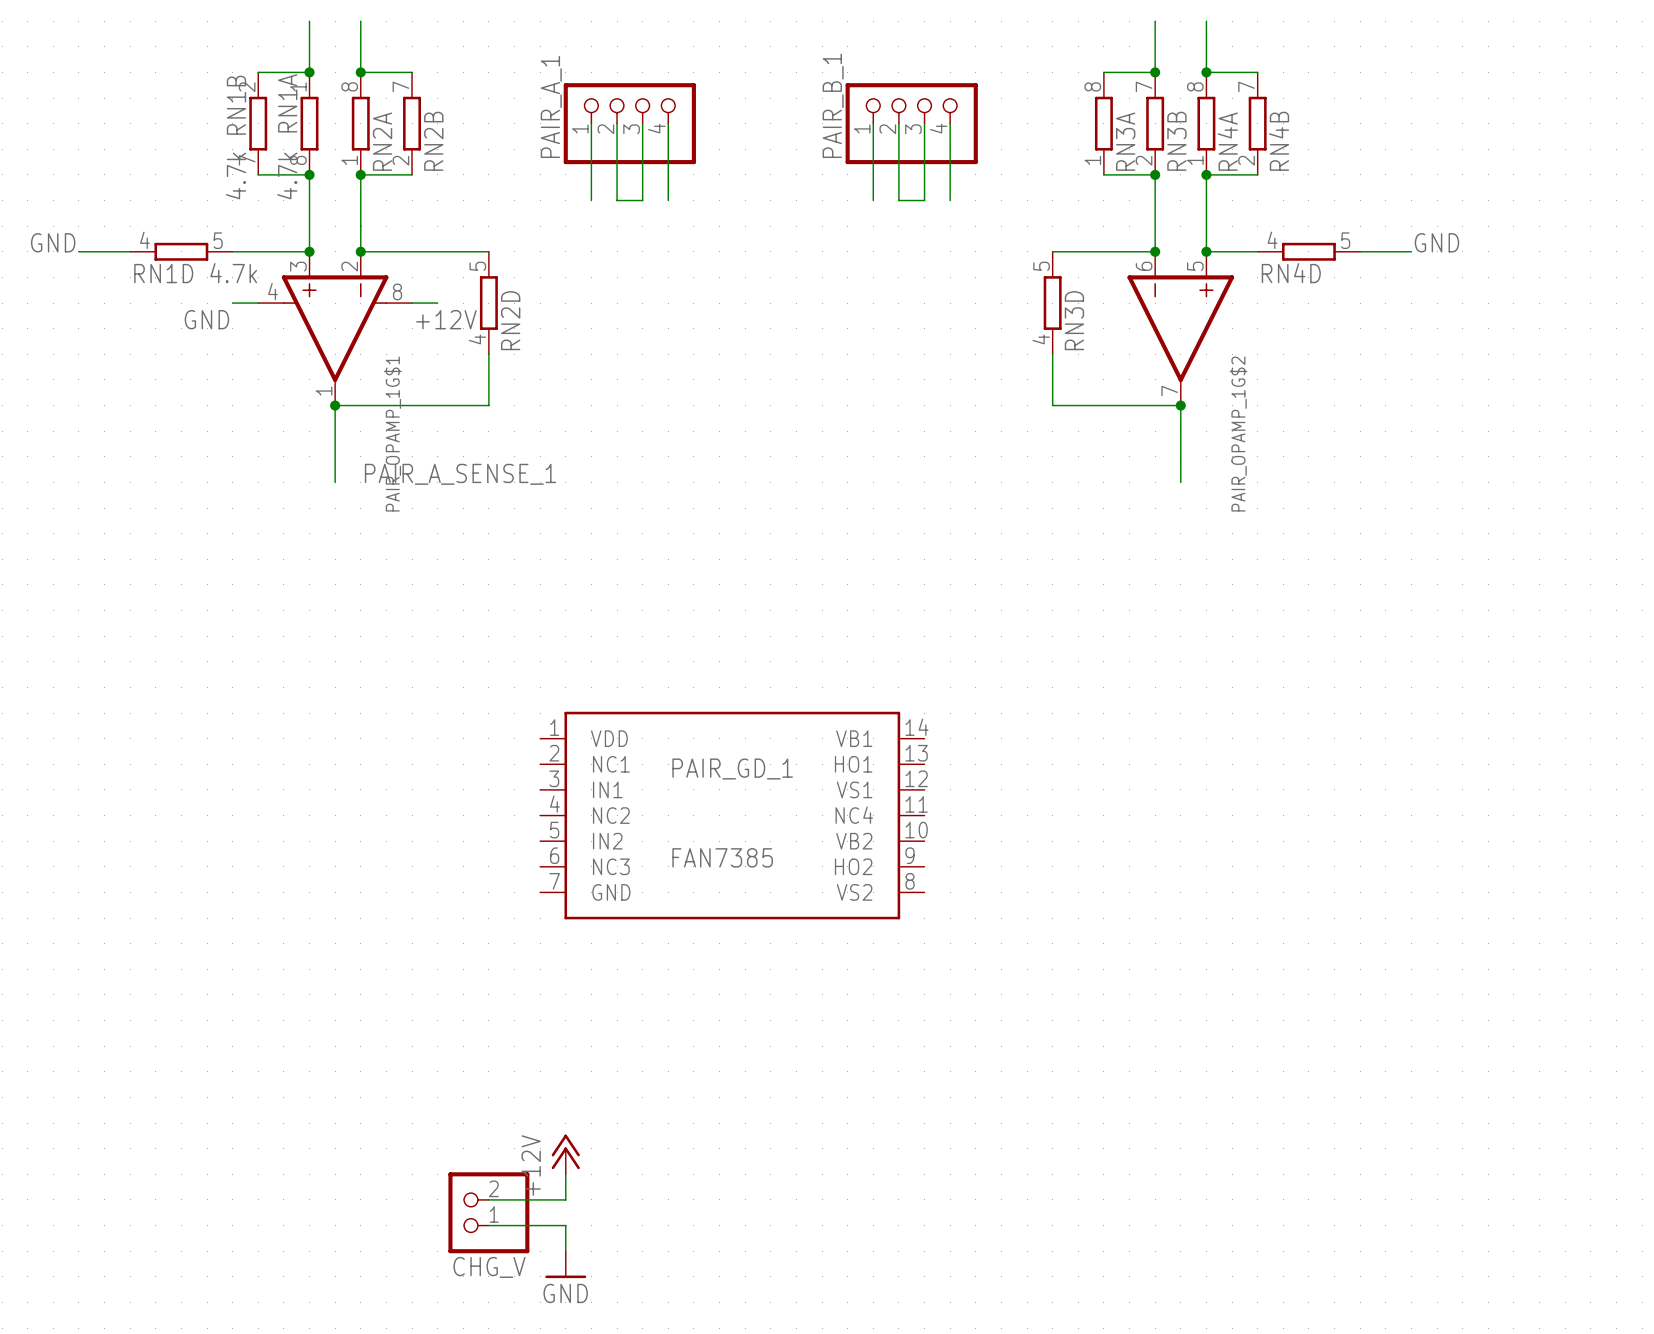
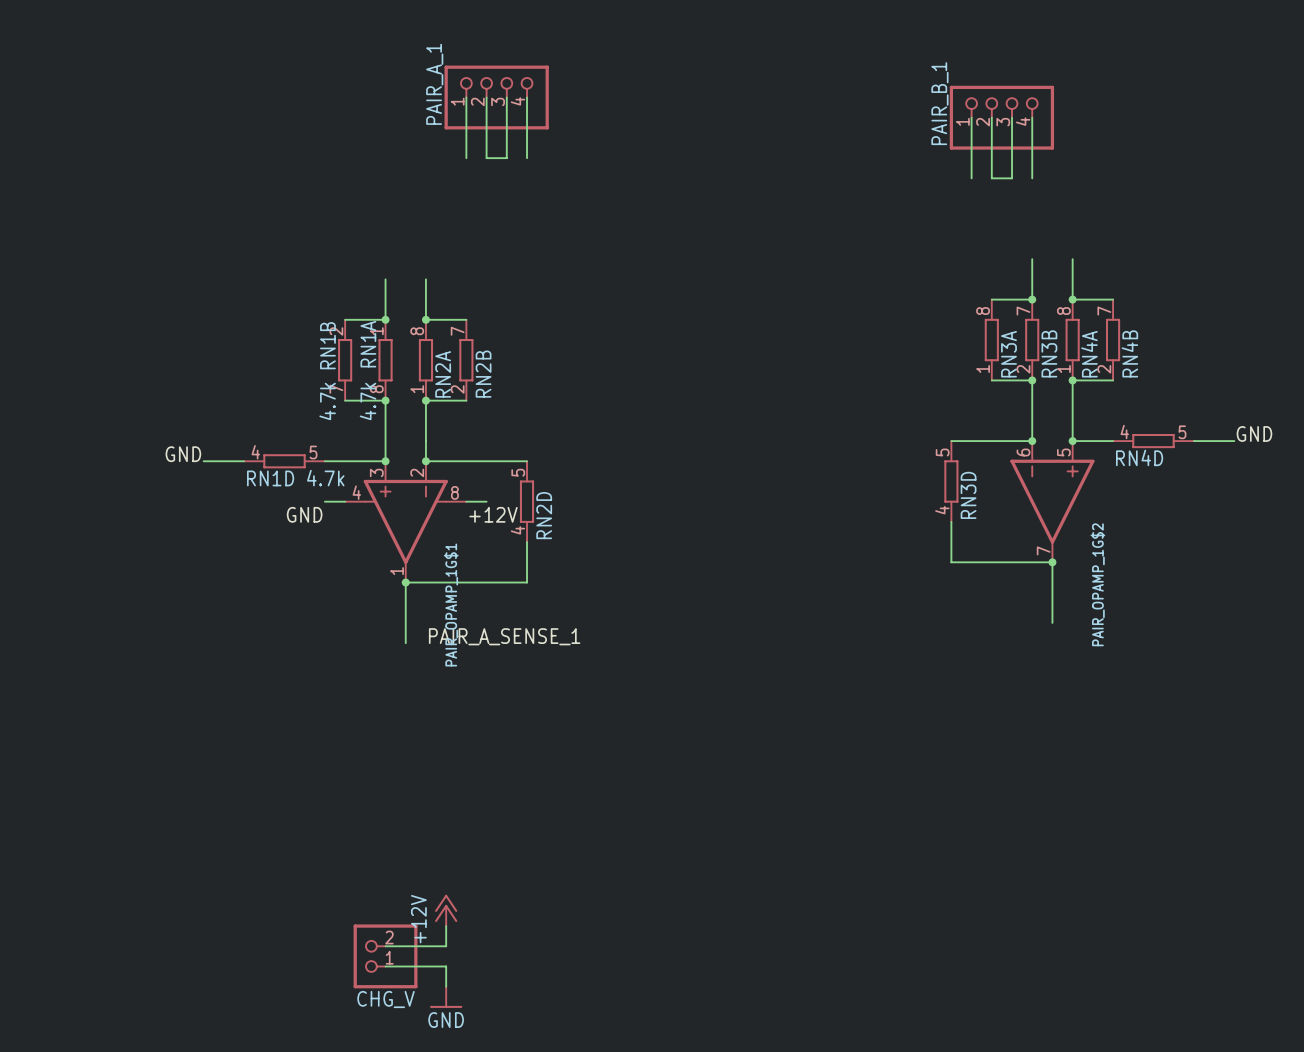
wire: (309, 21) (309, 72) (258, 72) -> none
wire: (360, 21) (360, 72) (412, 72) -> none
wire: (1155, 21) (1155, 72) (1103, 72) -> none
wire: (1206, 21) (1206, 72) (1257, 72) -> none
junction: (309, 72) -> none
junction: (360, 72) -> none
junction: (1155, 72) -> none
junction: (1206, 72) -> none
RN1B position: (258, 123) -> (345, 360)
RN1A position: (309, 123) -> (385, 360)
RN2A position: (360, 123) -> (425, 360)
RN2B position: (412, 123) -> (466, 360)
wire: (873, 123) (873, 200) -> none
wire: (898, 123) (898, 200) (924, 200) (924, 123) -> none
PAIR_B_1 position: (911, 123) -> (1001, 117)
wire: (950, 123) (950, 200) -> none
RN3A position: (1103, 123) -> (991, 340)
RN3B position: (1155, 123) -> (1032, 340)
RN4A position: (1206, 123) -> (1072, 340)
RN4B position: (1257, 123) -> (1113, 340)
wire: none -> (971, 117) (971, 178)
wire: none -> (991, 117) (991, 178) (1012, 178) (1012, 117)
wire: none -> (1032, 117) (1032, 178)
wire: (258, 174) (309, 174) (309, 251) (232, 251) -> none
junction: (309, 174) -> none
junction: (360, 174) -> none
wire: (412, 174) (360, 174) (360, 251) (488, 251) -> none
wire: (1103, 174) (1155, 174) (1155, 251) (1052, 251) -> none
junction: (1155, 174) -> none
junction: (1206, 174) -> none
wire: (1257, 174) (1206, 174) (1206, 251) (1257, 251) -> none
label: GND (53, 242) -> none
label: GND (1436, 242) -> none
wire: (78, 251) (130, 251) -> none
RN1D position: (181, 251) -> (284, 461)
junction: (309, 251) -> none
junction: (360, 251) -> none
junction: (1155, 251) -> none
junction: (1206, 251) -> none
RN4D position: (1308, 251) -> (1153, 441)
wire: (1360, 251) (1411, 251) -> none
wire: (232, 303) (258, 303) -> none
wire: (412, 303) (437, 303) -> none
RN2D position: (488, 303) -> (527, 501)
RN3D position: (1052, 303) -> (951, 481)
label: GND (206, 319) -> none
label: +12V (446, 319) -> none
PAIR_OPAMP_1G$1 position: (335, 328) -> (405, 521)
PAIR_OPAMP_1G$2 position: (1180, 328) -> (1052, 501)
wire: none -> (1032, 259) (1032, 299) (991, 299)
wire: none -> (1072, 259) (1072, 299) (1113, 299)
wire: none -> (425, 279) (425, 319) (466, 319)
wire: (1052, 354) (1052, 405) (1180, 405) (1180, 482) -> none
junction: none -> (1032, 299)
junction: none -> (1072, 299)
junction: (335, 405) -> none
wire: (437, 405) (335, 405) (335, 482) -> none
junction: none -> (385, 319)
junction: none -> (425, 319)
junction: (1180, 405) -> none
label: PAIR_A_SENSE_1 (460, 474) -> none
wire: none -> (991, 380) (1032, 380) (1032, 441) (951, 441)
junction: none -> (1032, 380)
junction: none -> (1072, 380)
wire: none -> (1113, 380) (1072, 380) (1072, 441) (1113, 441)
wire: none -> (345, 400) (385, 400) (385, 461) (324, 461)
junction: none -> (385, 400)
junction: none -> (425, 400)
wire: none -> (466, 400) (425, 400) (425, 461) (527, 461)
label: none -> GND (1254, 433)
junction: none -> (1032, 441)
junction: none -> (1072, 441)
wire: none -> (1193, 441) (1234, 441)
label: none -> GND (183, 454)
wire: none -> (203, 461) (244, 461)
junction: none -> (385, 461)
junction: none -> (425, 461)
wire: none -> (324, 501) (345, 501)
wire: none -> (466, 501) (486, 501)
label: none -> GND (304, 514)
label: none -> +12V (493, 514)
wire: none -> (951, 521) (951, 562) (1052, 562) (1052, 622)
wire: none -> (527, 542) (527, 582) (405, 582) (405, 643)
junction: none -> (1052, 562)
junction: none -> (405, 582)
label: none -> PAIR_A_SENSE_1 (504, 636)
PAIR_GD_1: (732, 815) -> none

